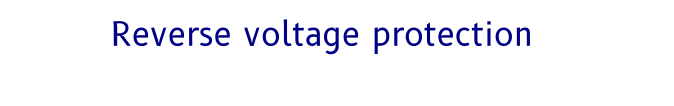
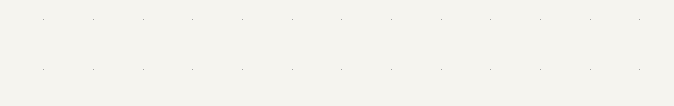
text: Reverse voltage protection (321, 36) -> none

